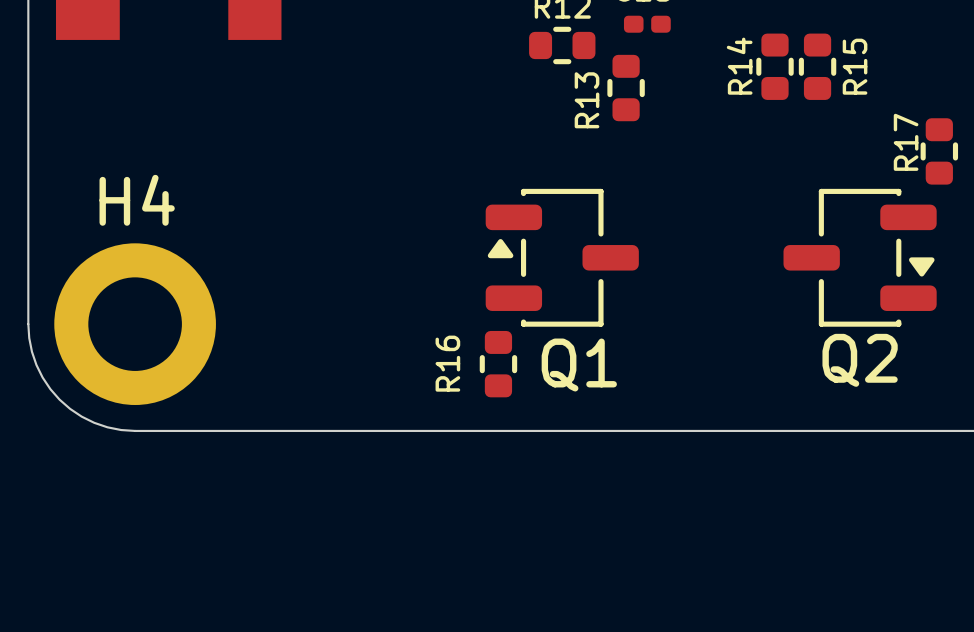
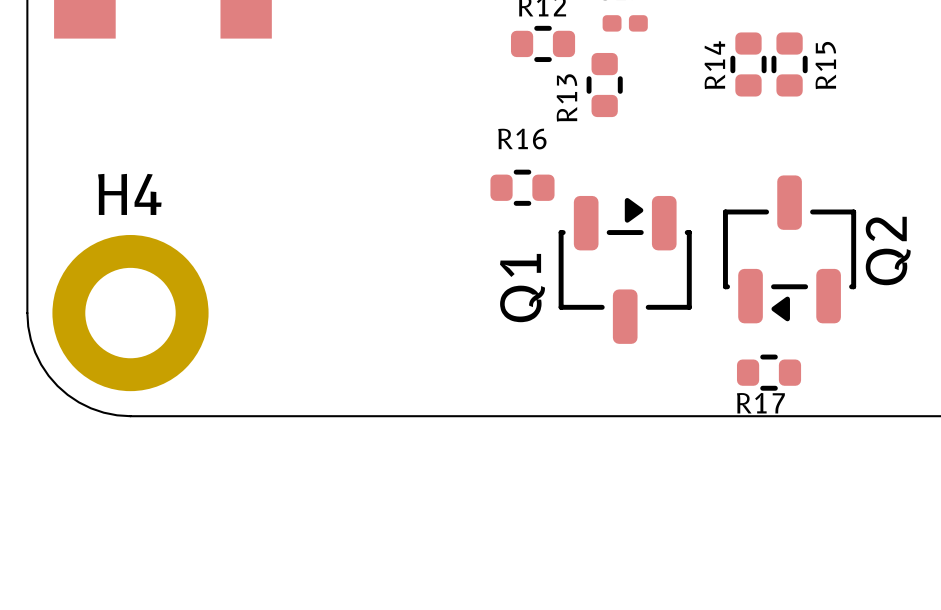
R17 rotation: 0° (939, 151) -> 90° clockwise (769, 372)
R17 position: (939, 151) -> (769, 372)
Q1 rotation: 0° (562, 257) -> 90° clockwise (625, 269)
Q2 rotation: 0° (860, 257) -> 90° clockwise (789, 249)
Q2 name position: Q2 (860, 360) -> Q2 (888, 251)
R16 rotation: 0° (498, 364) -> 90° clockwise (522, 187)
R16 position: (498, 364) -> (522, 187)

